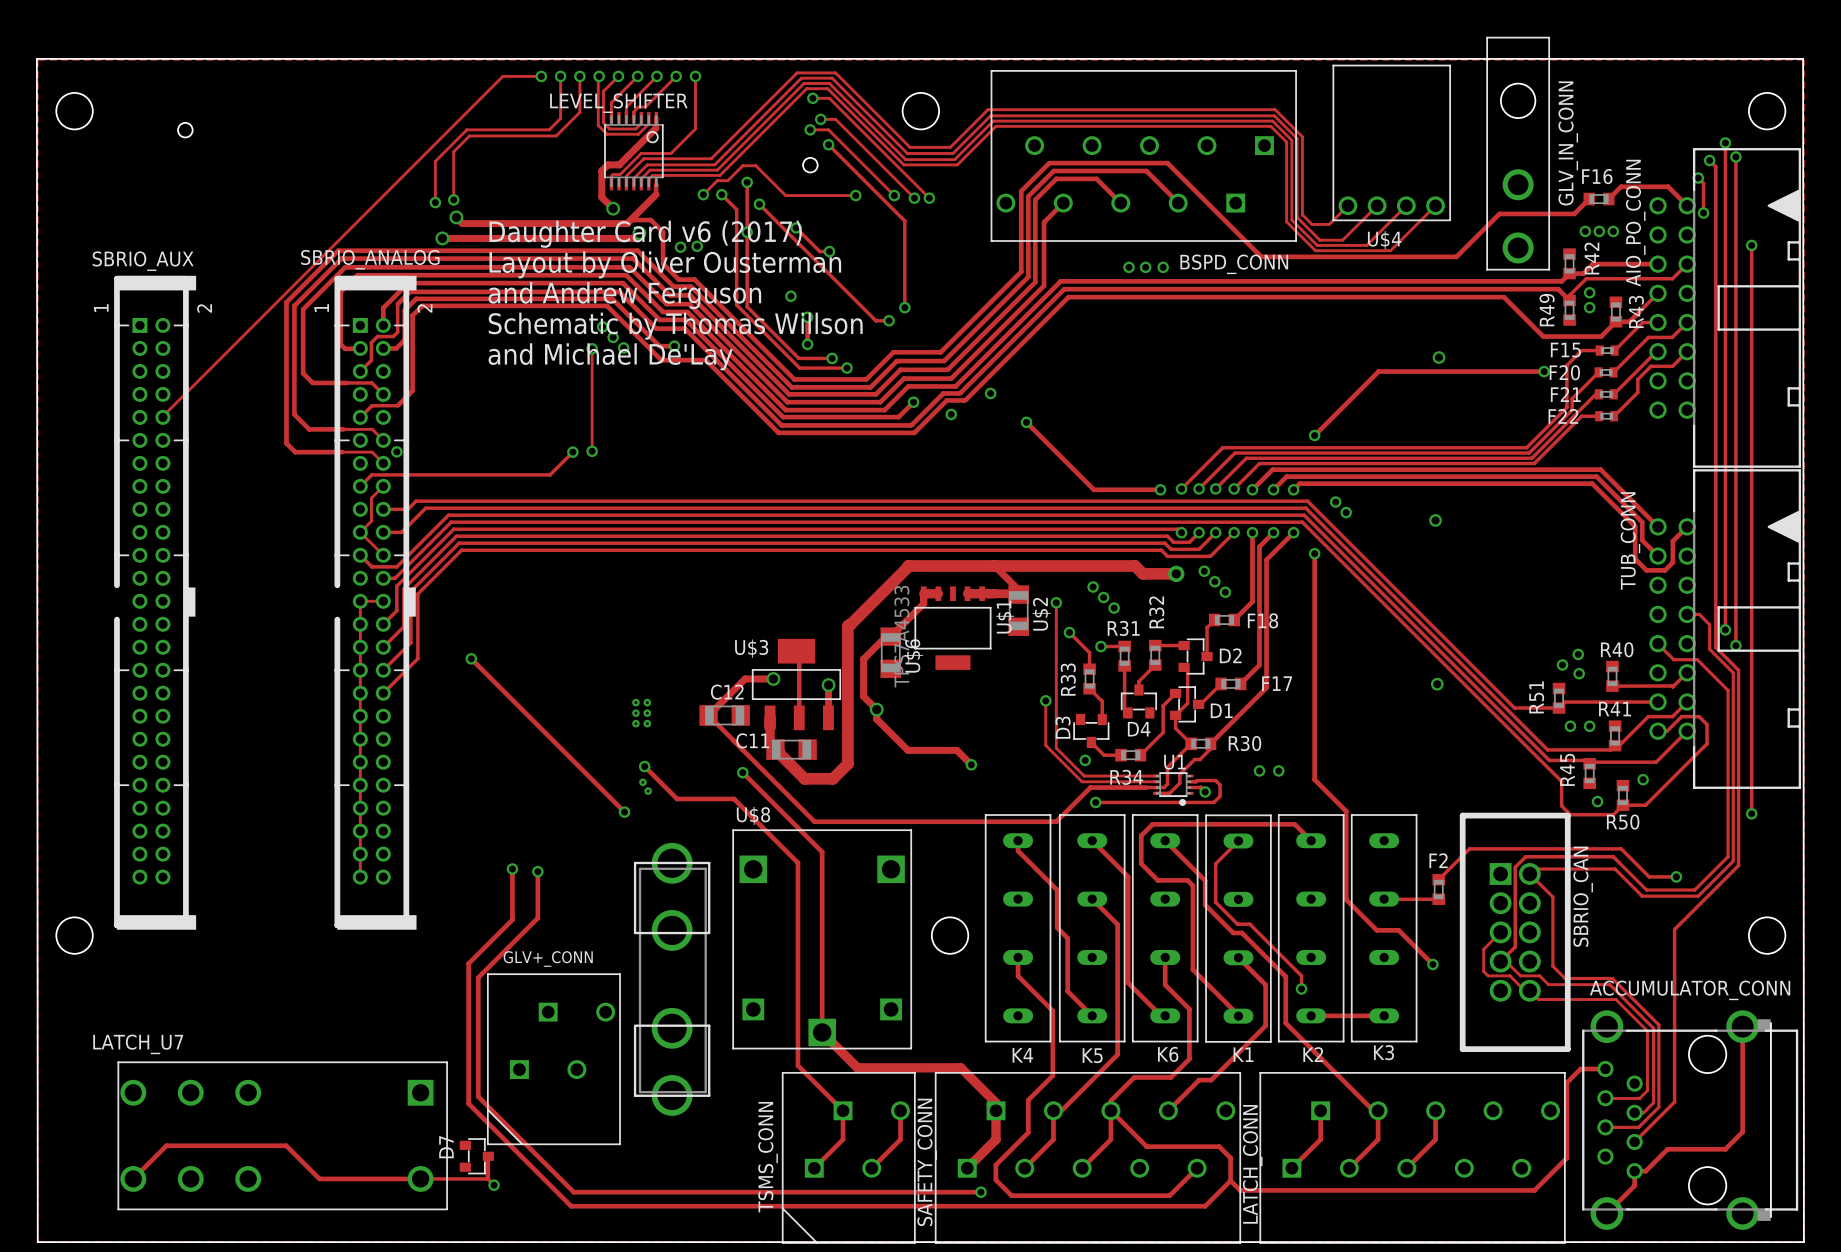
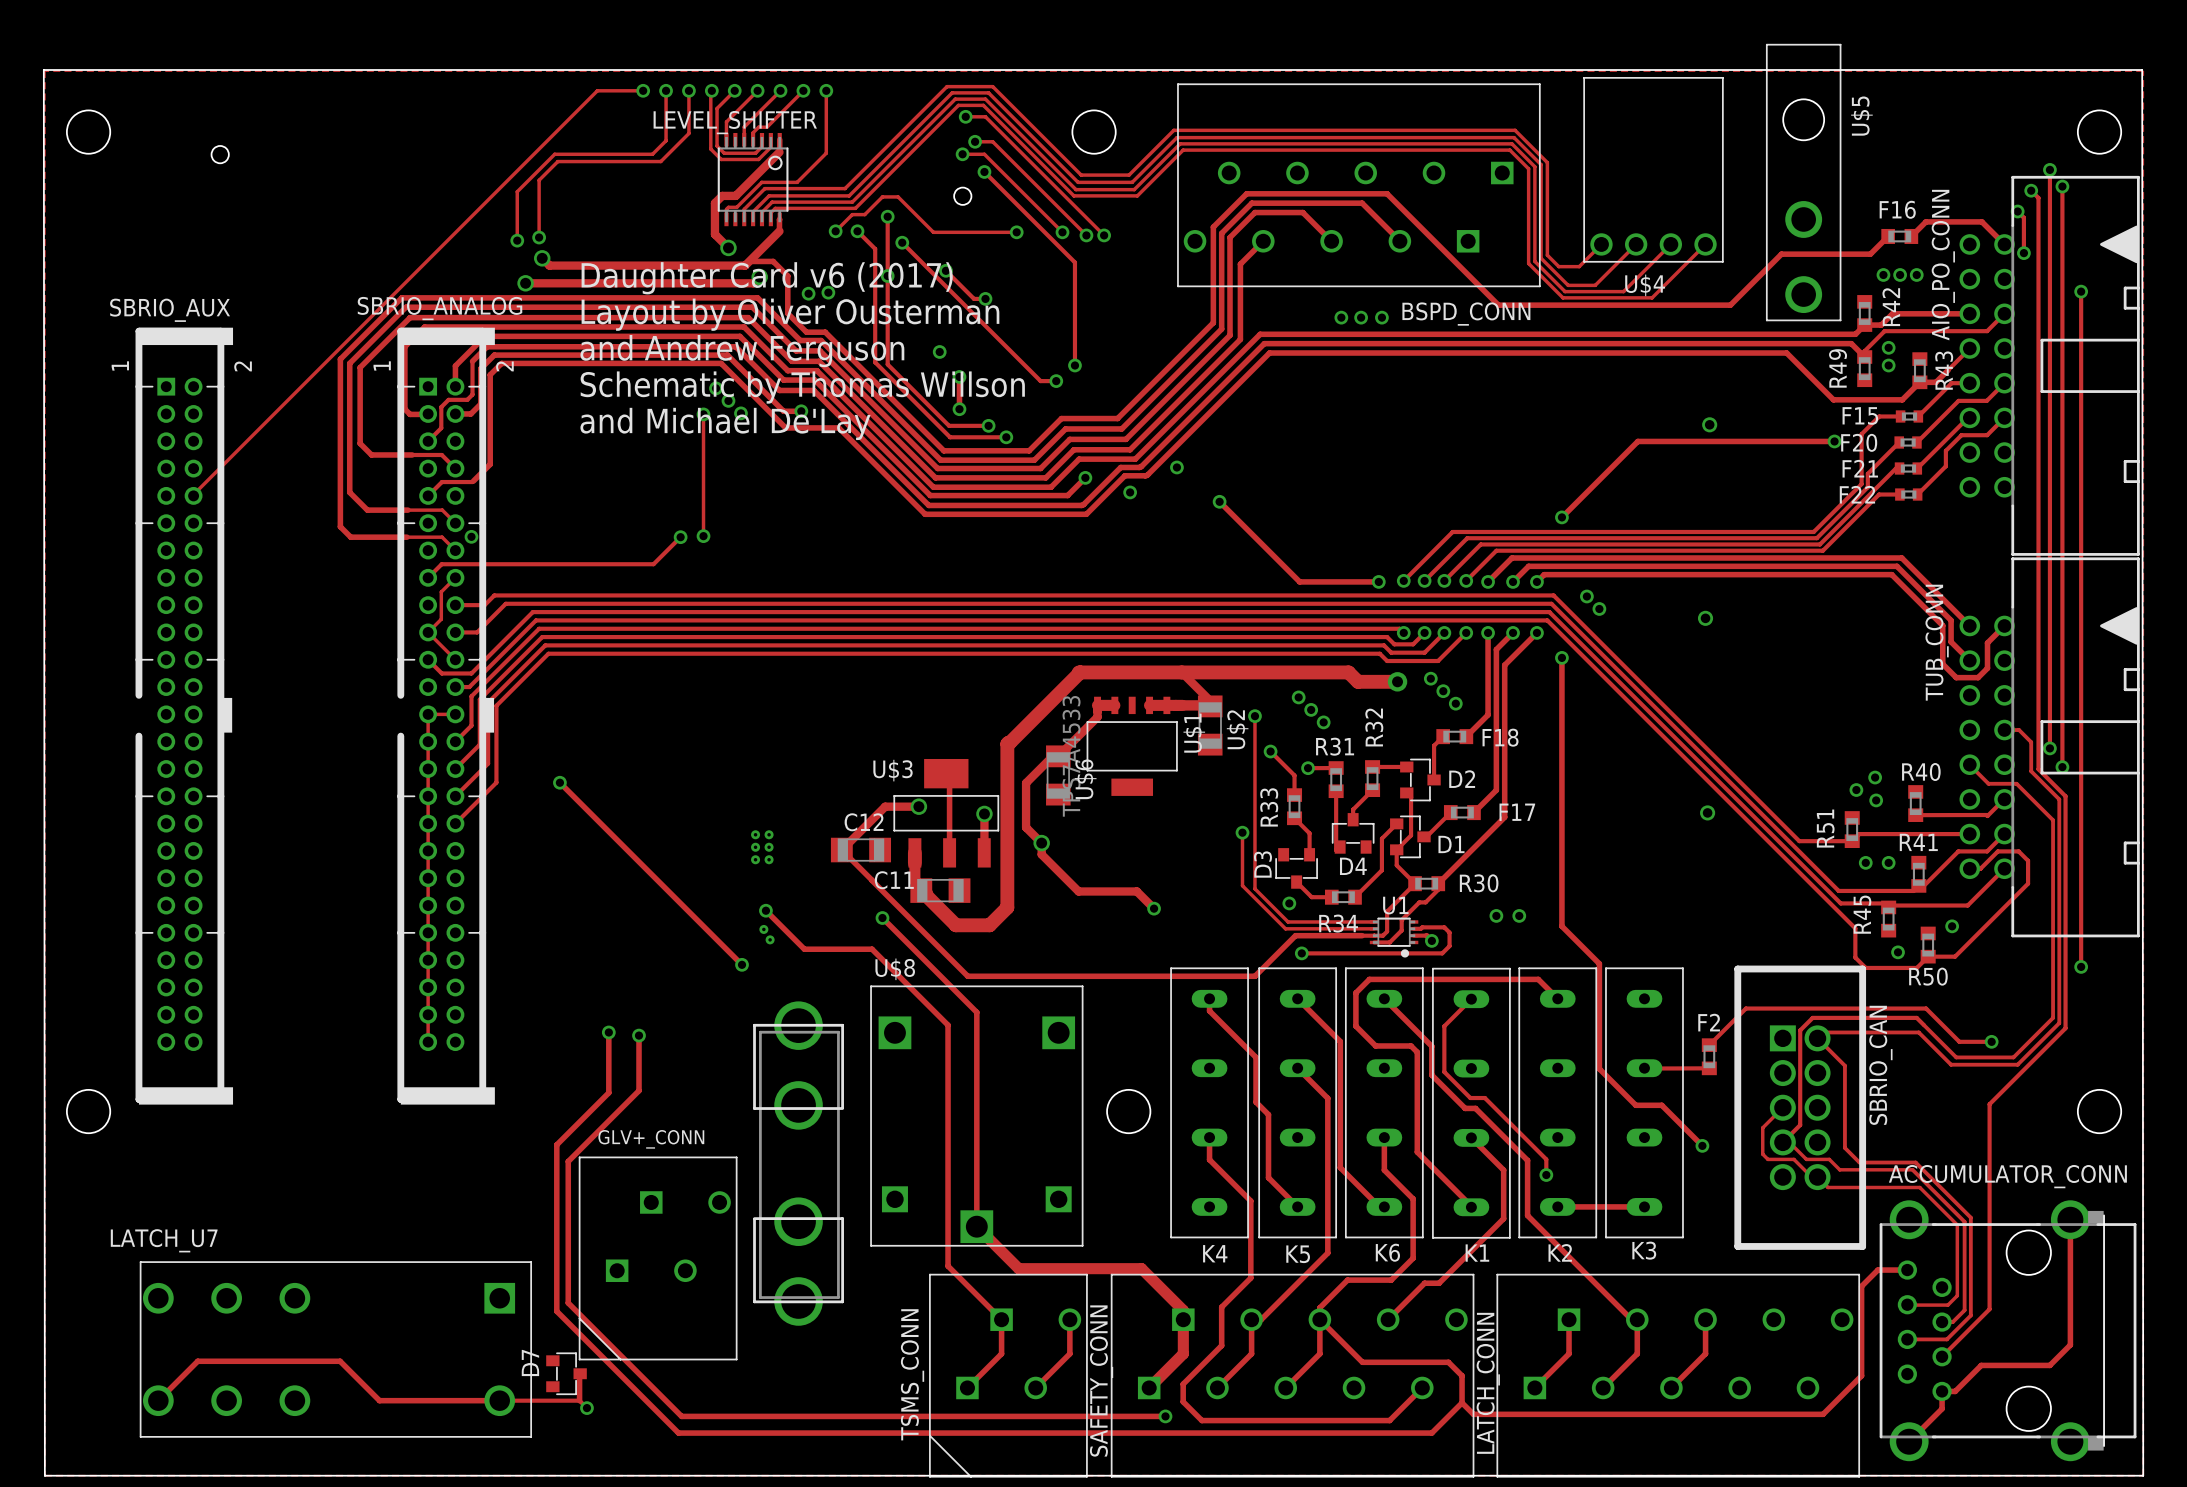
GLV_IN_CONN name: GLV_IN_CONN (1568, 143) -> U$5 (1861, 116)

